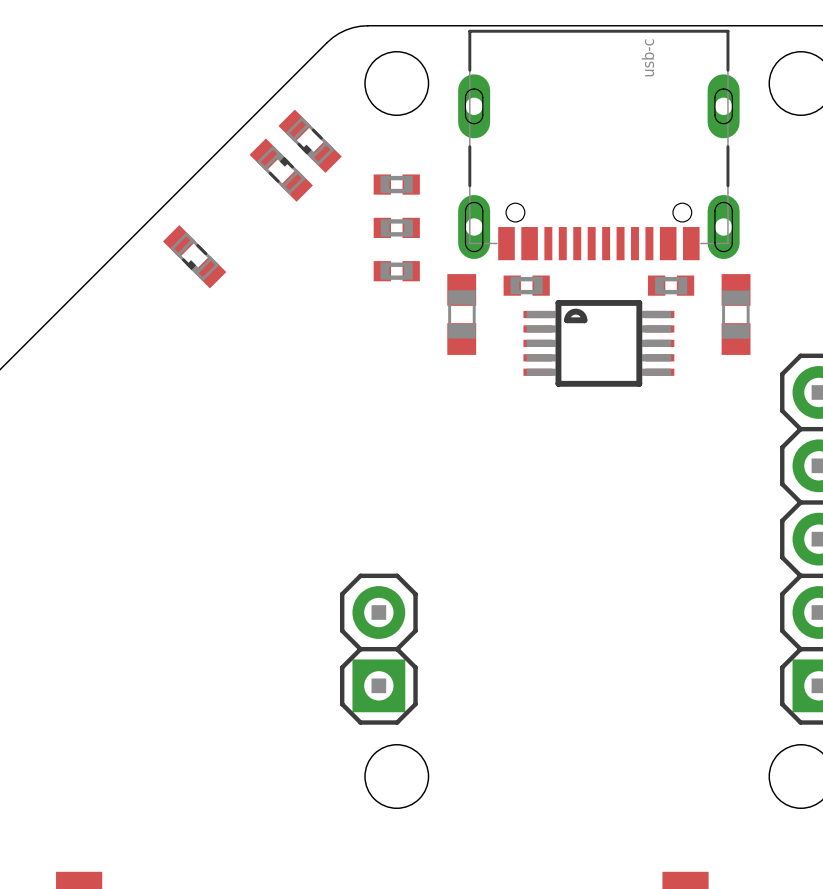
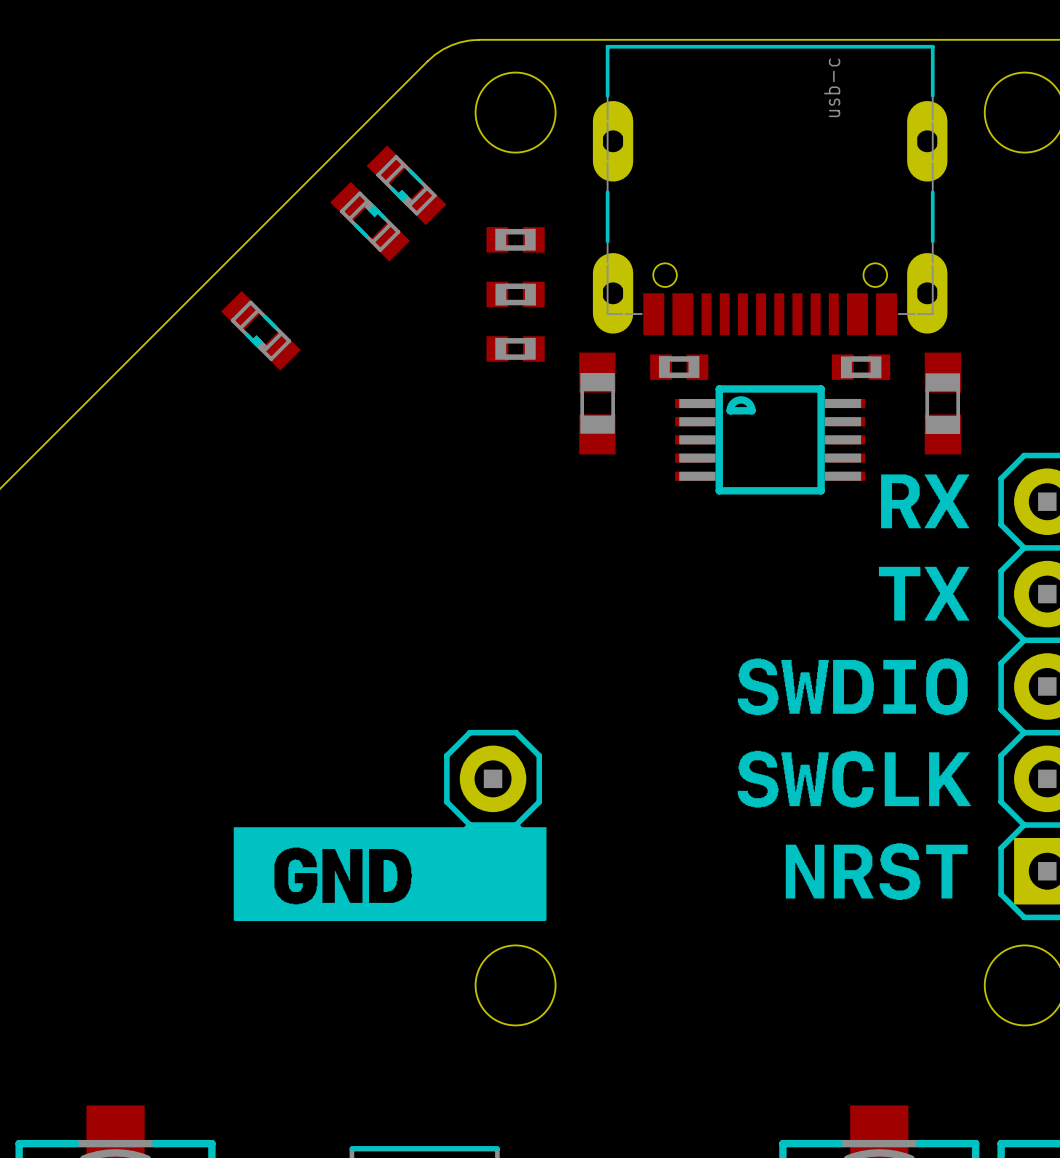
drawing: none -> [737, 474, 972, 900]
drawing: none -> [233, 827, 547, 922]

